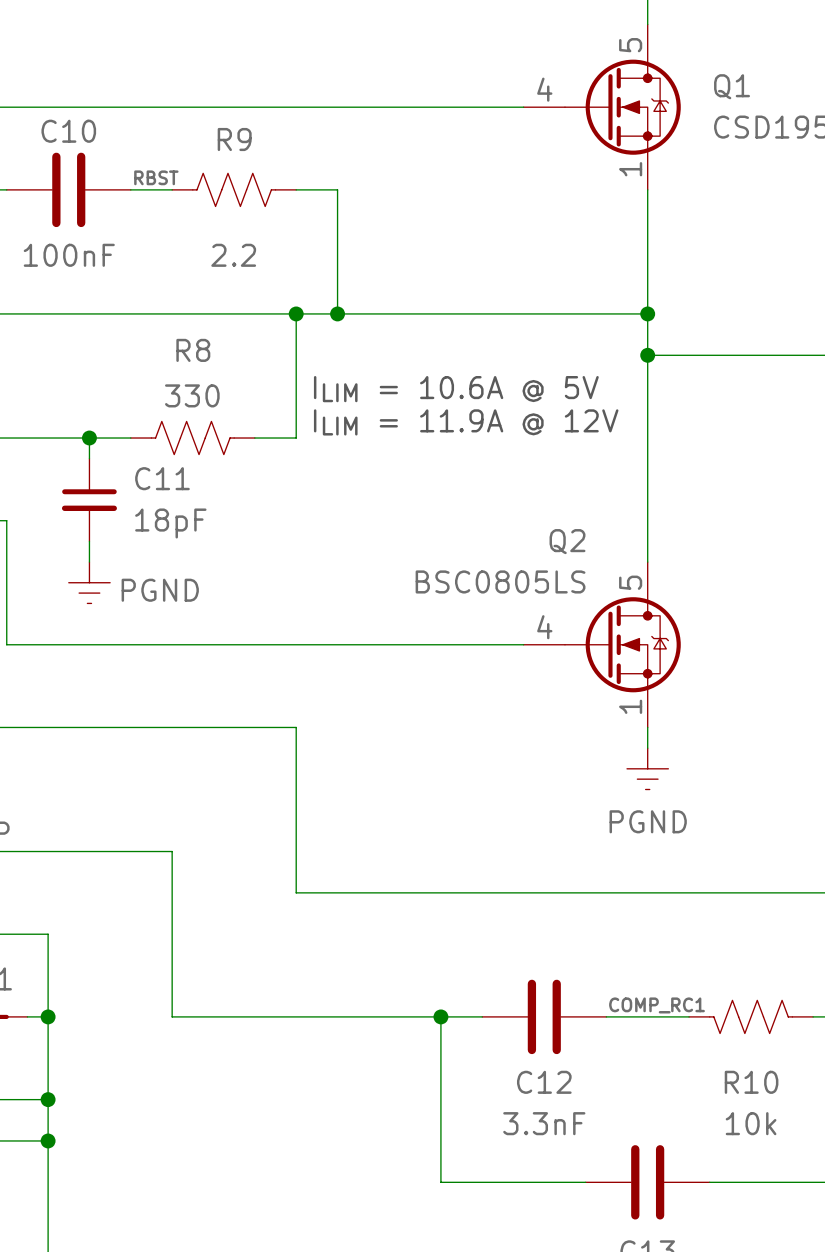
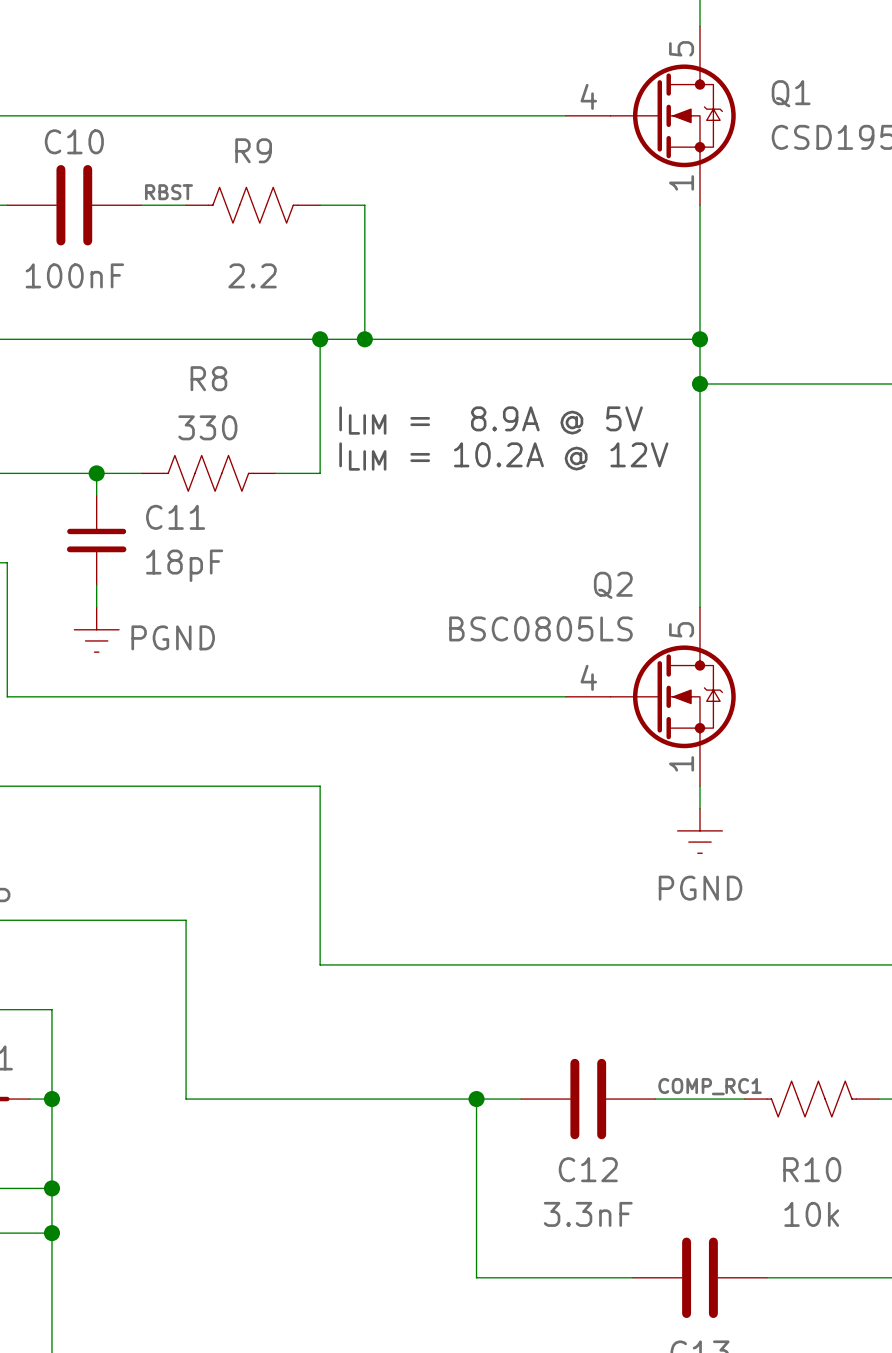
text: ILIM = 10.6A @ 5V (456, 389) -> ILIM = 8.9A @ 5V (491, 420)
text: ILIM = 11.9A @ 12V (466, 422) -> ILIM = 10.2A @ 12V (503, 456)

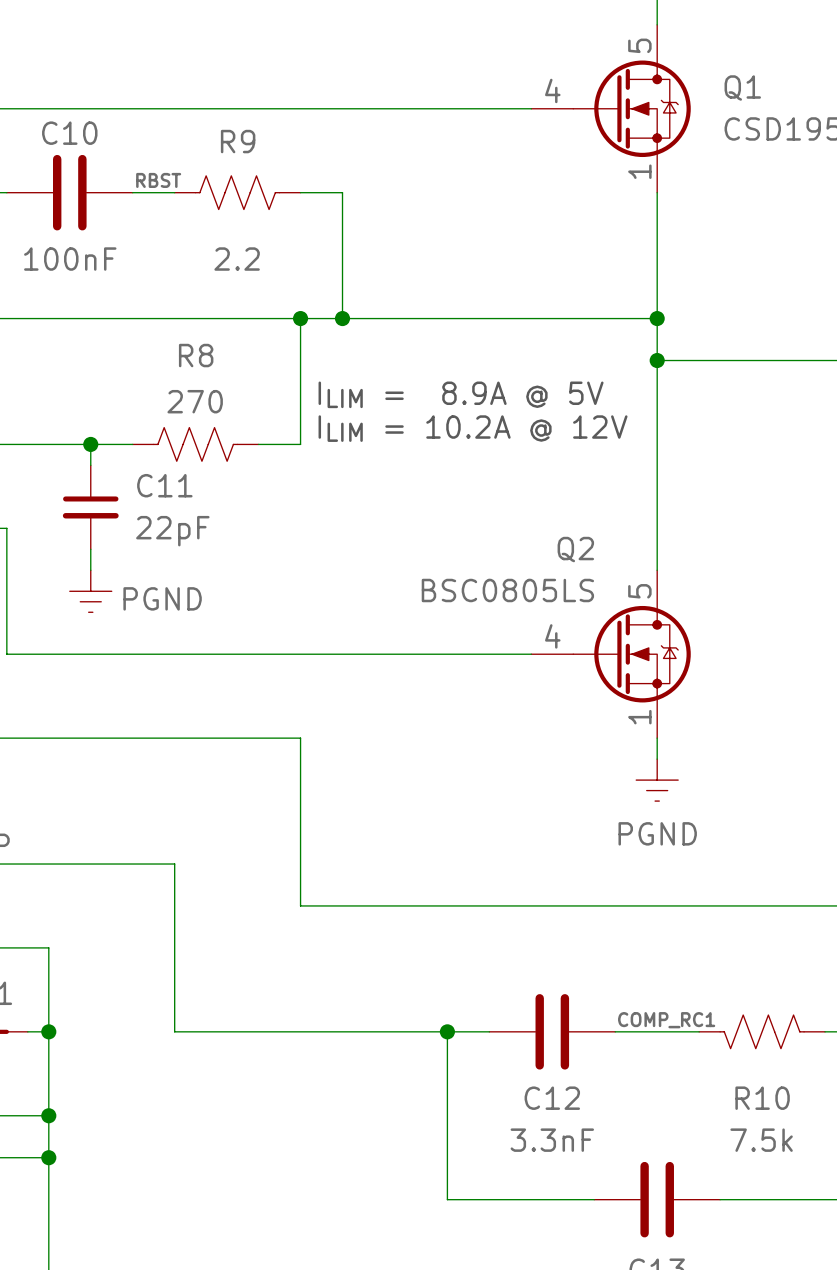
R8 value: 330 (207, 427) -> 270 (195, 401)
C11 value: 18pF (184, 565) -> 22pF (172, 531)
R10 value: 10k (811, 1214) -> 7.5k (761, 1140)

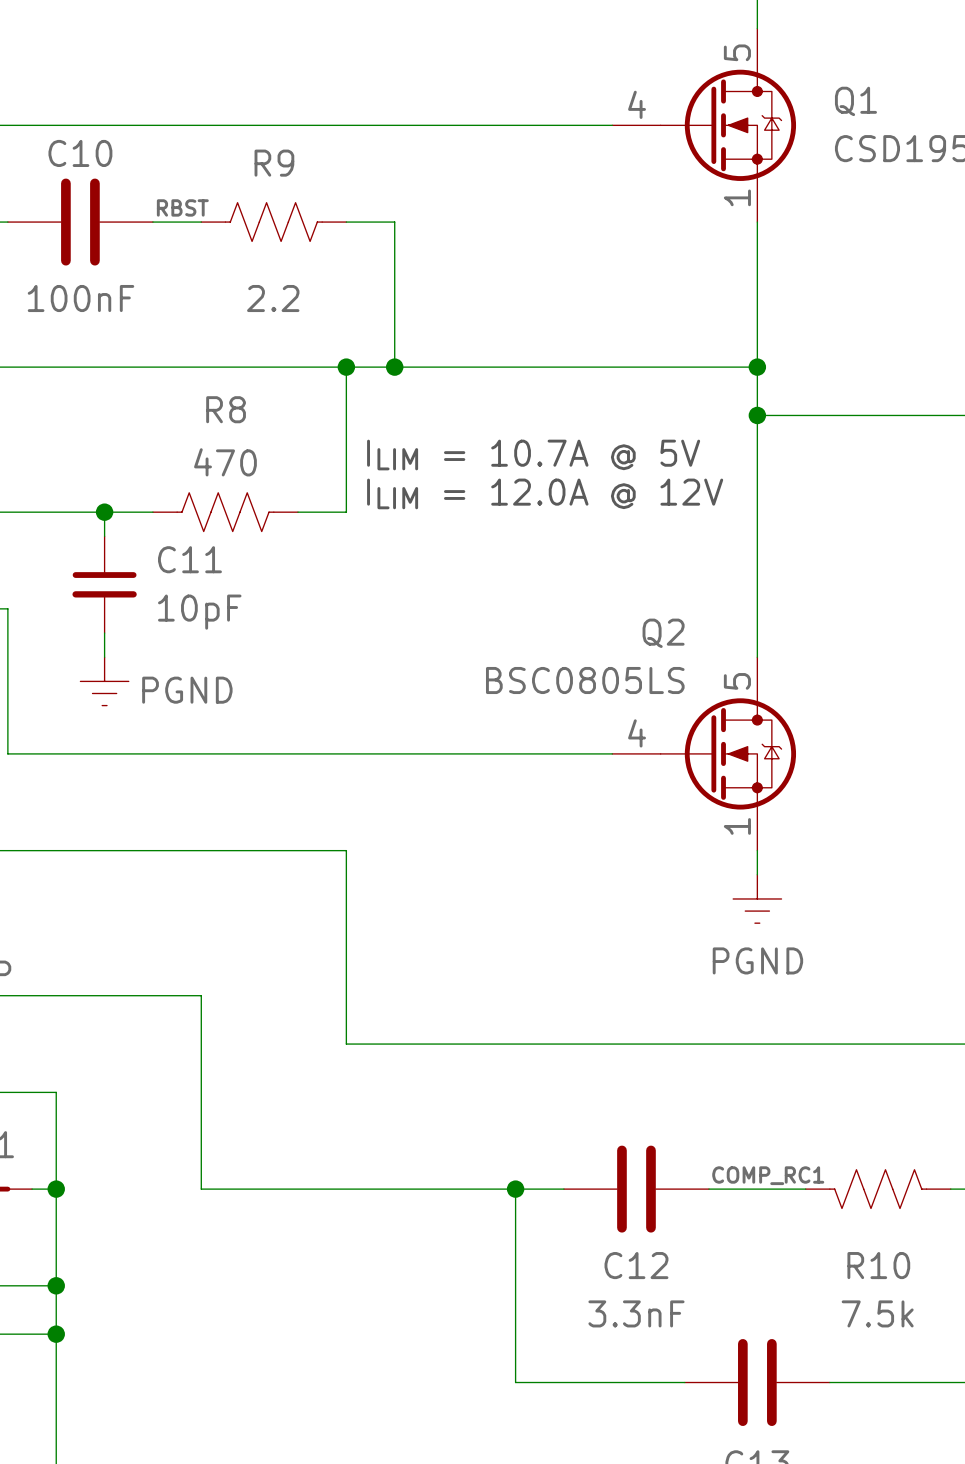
text: ILIM = 8.9A @ 5V (461, 394) -> ILIM = 10.7A @ 5V (533, 455)
R8 value: 270 (195, 401) -> 470 (225, 462)
text: ILIM = 10.2A @ 12V (473, 428) -> ILIM = 12.0A @ 12V (545, 493)
C11 value: 22pF (172, 531) -> 10pF (199, 612)

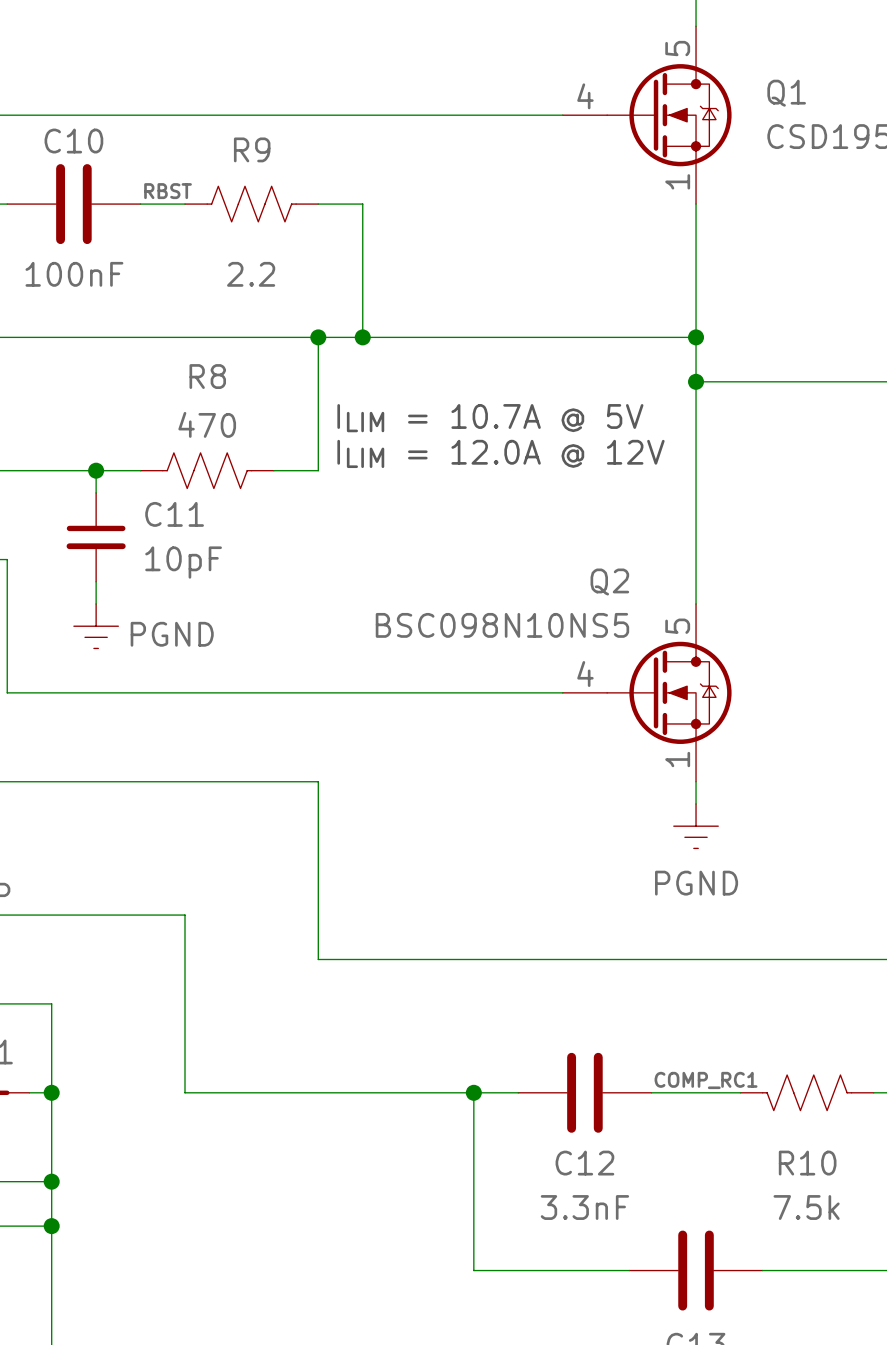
Q2 value: BSC0805LS (585, 680) -> BSC098N10NS5 (502, 625)

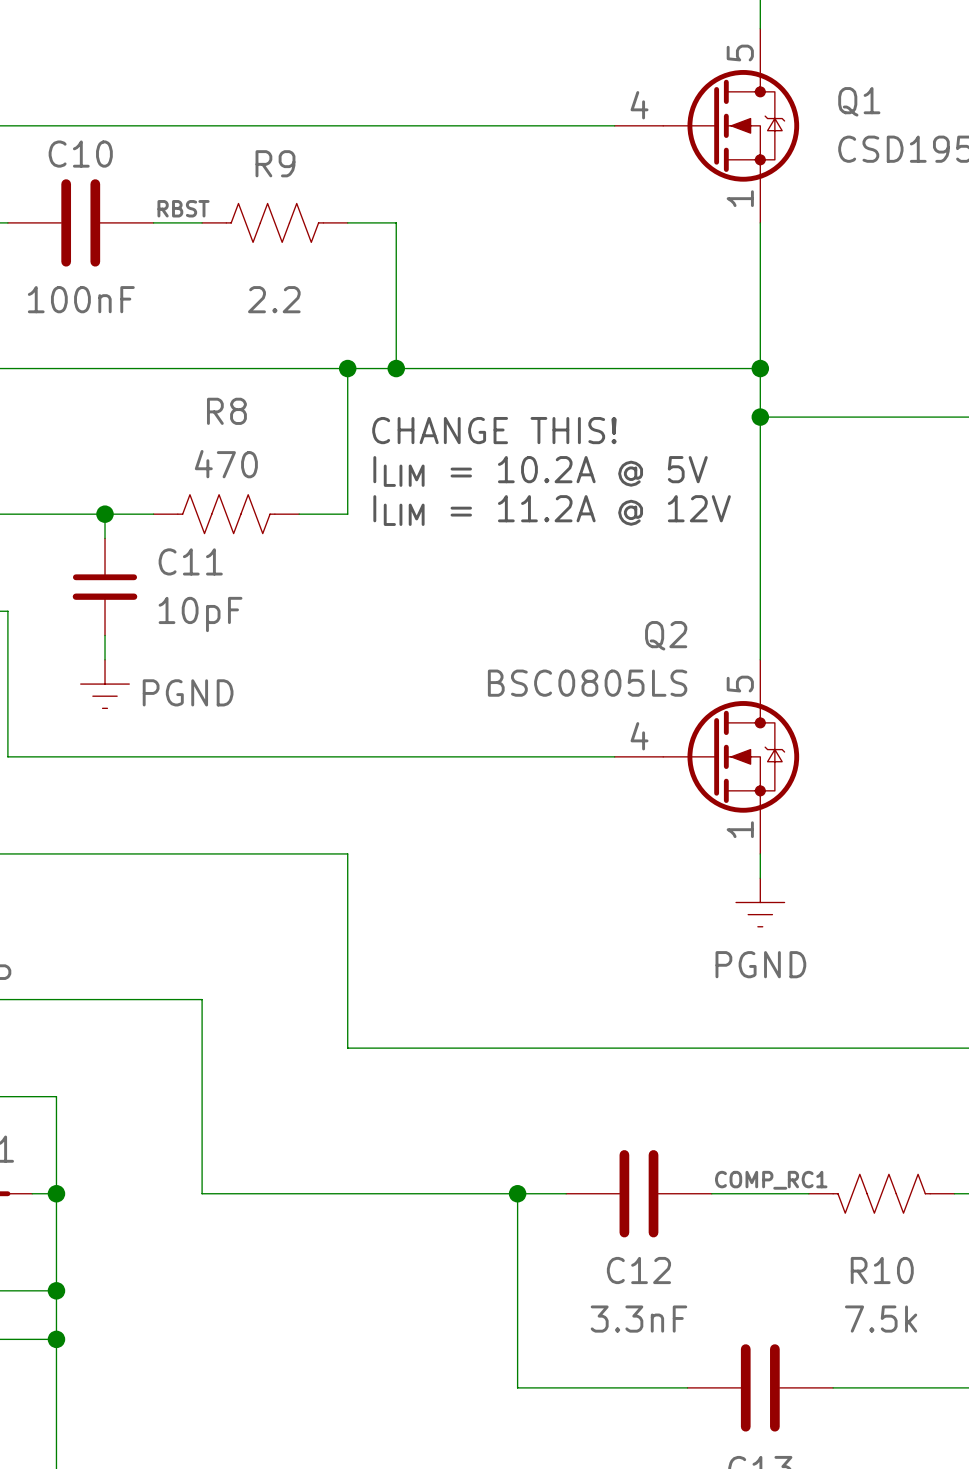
text: none -> CHANGE THIS! (494, 430)
text: ILIM = 10.7A @ 5V (490, 418) -> none
text: none -> ILIM = 10.2A @ 5V (540, 471)
text: ILIM = 12.0A @ 12V (500, 453) -> none
text: none -> ILIM = 11.2A @ 12V (552, 510)
Q2 value: BSC098N10NS5 (502, 625) -> BSC0805LS (587, 683)

